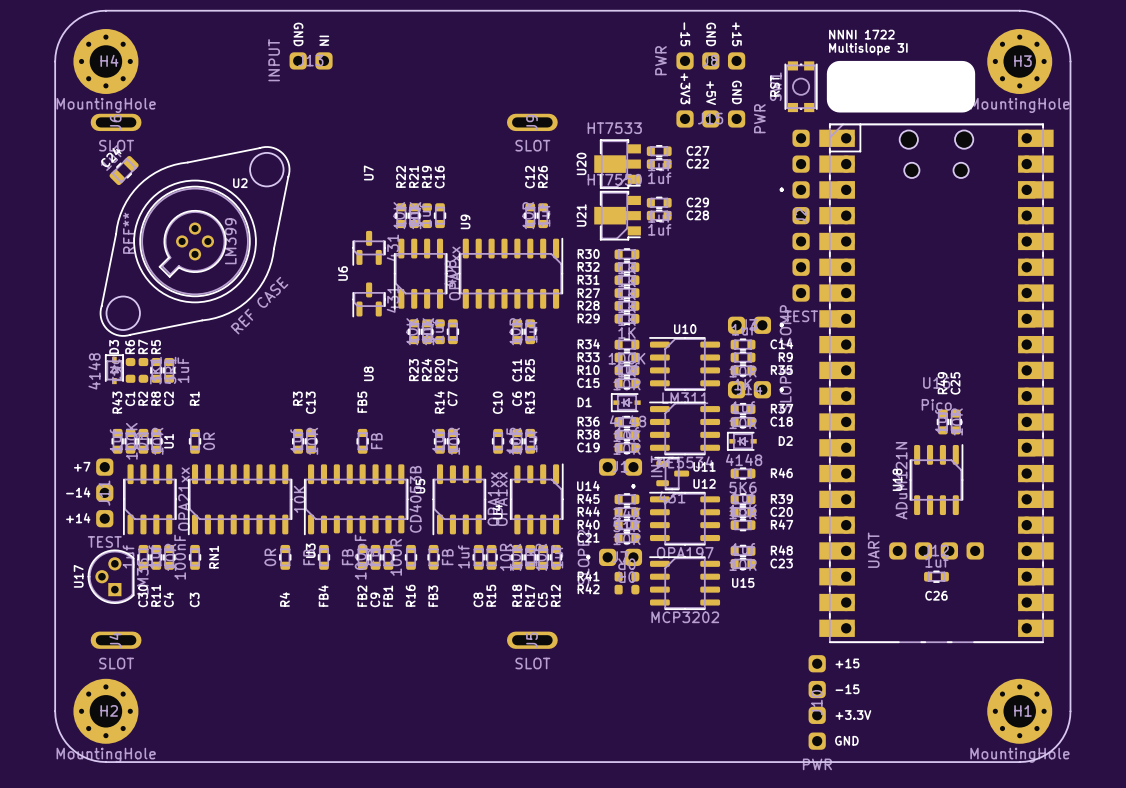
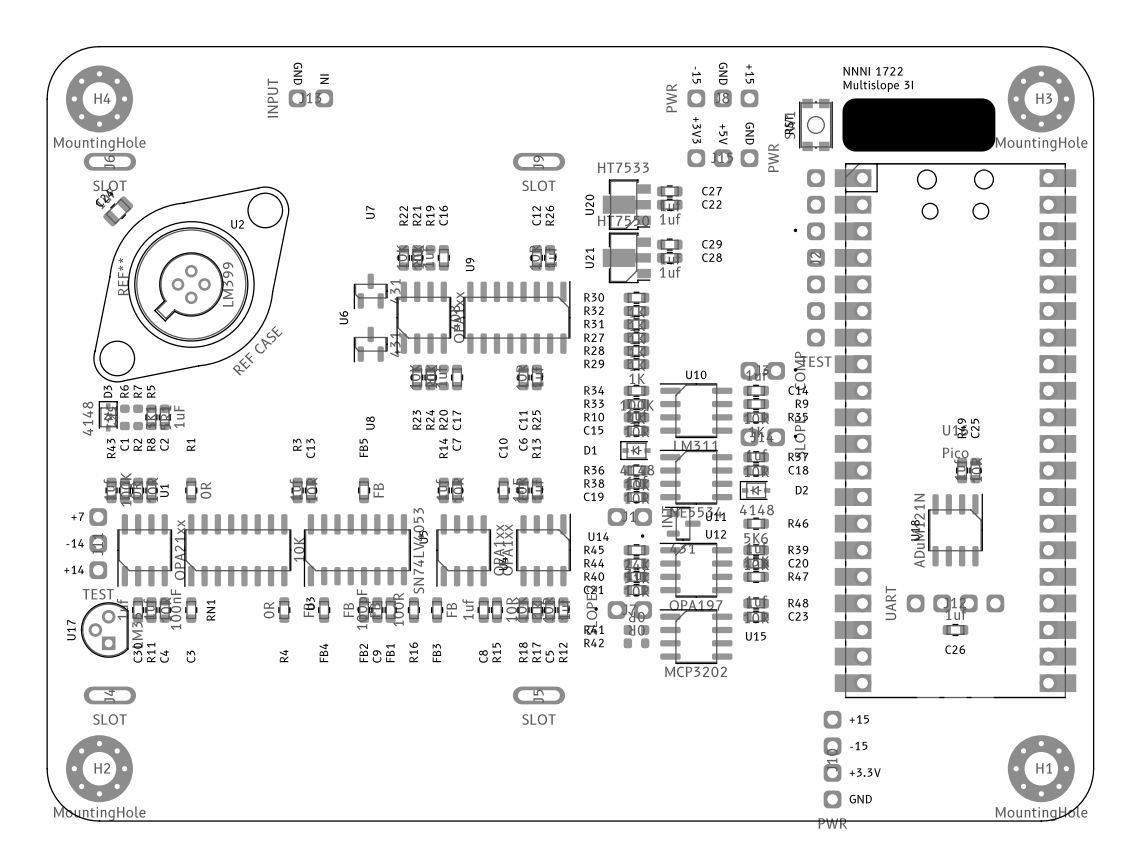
U3 value: CD4053B (415, 499) -> SN74LV4053 (418, 550)

